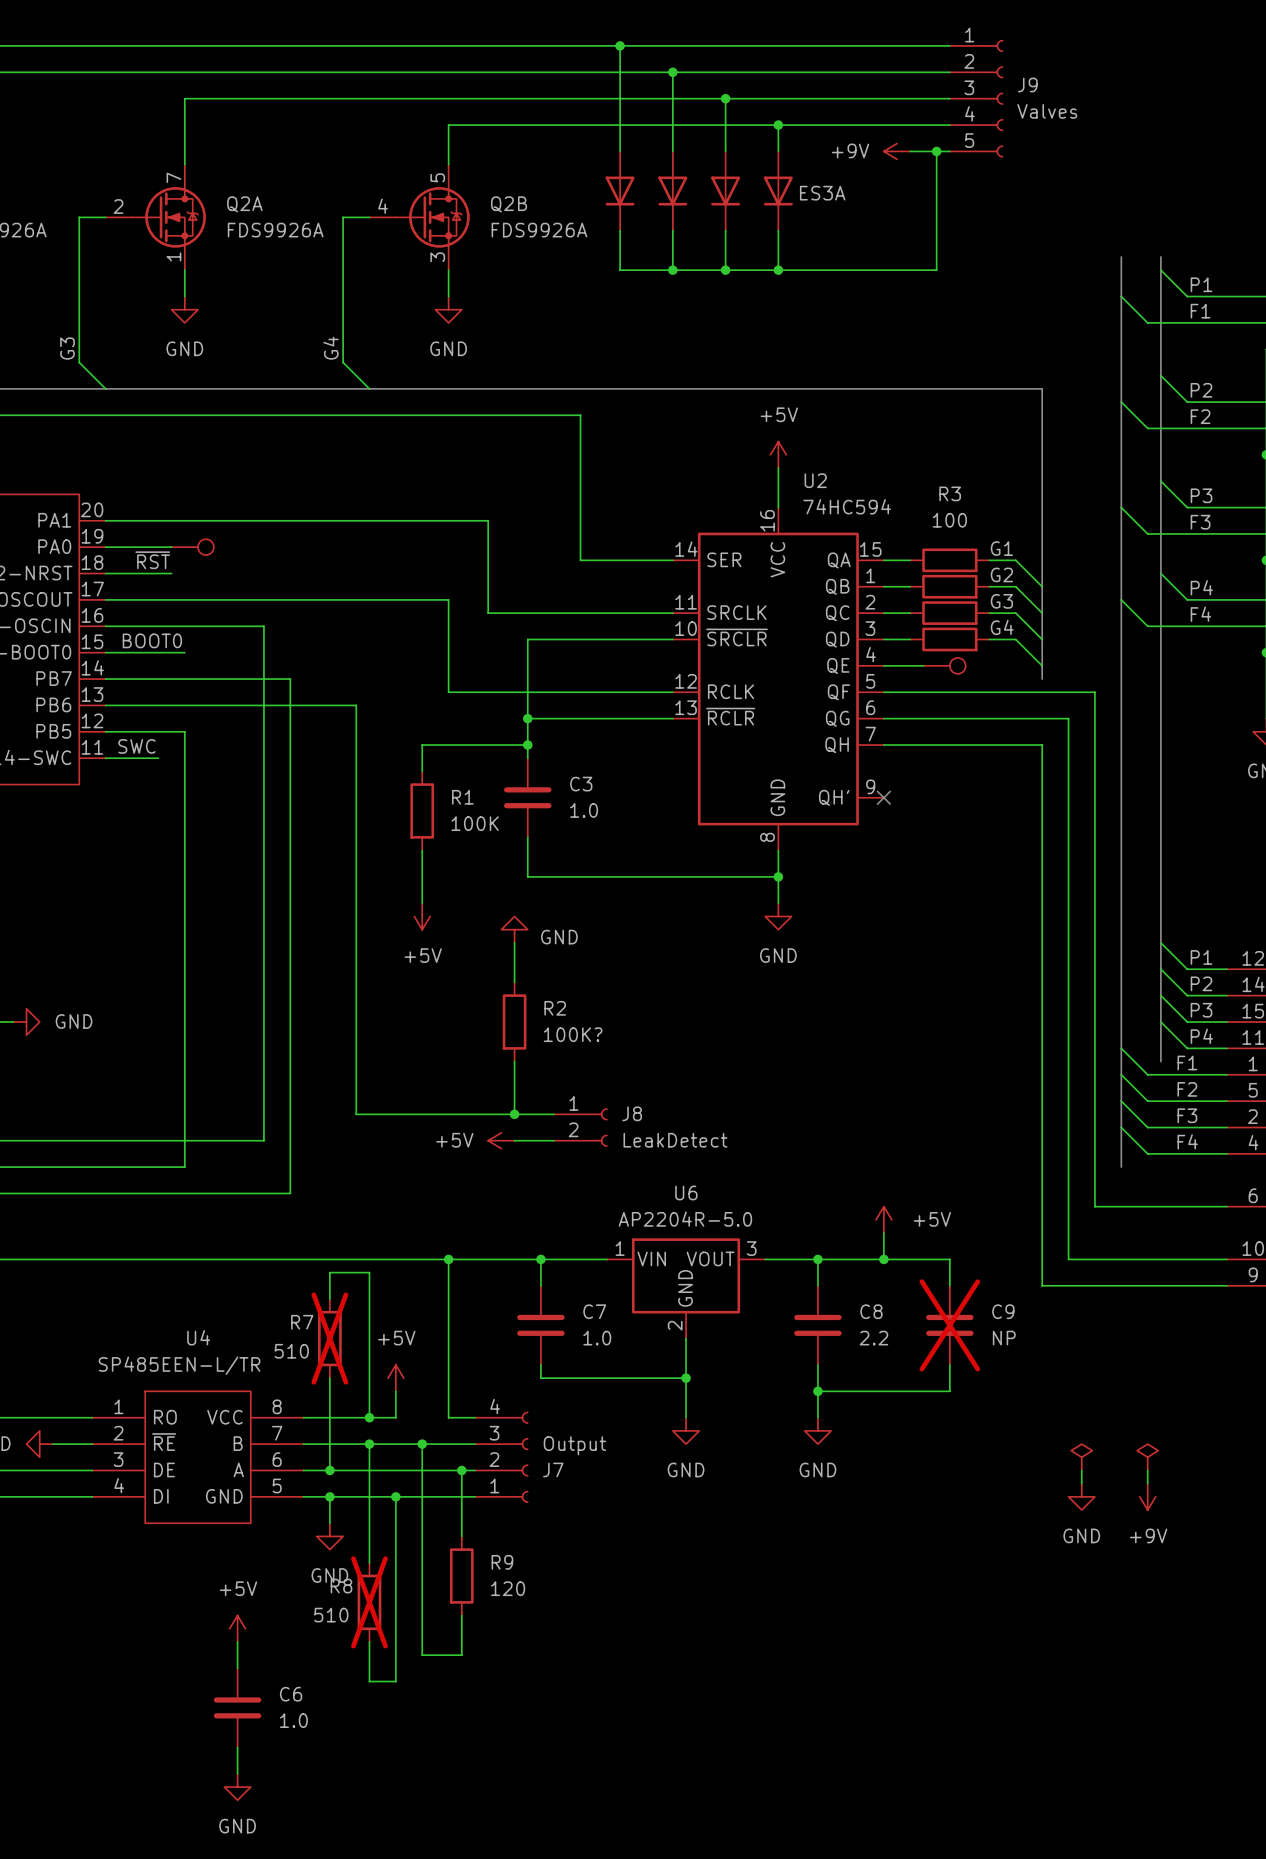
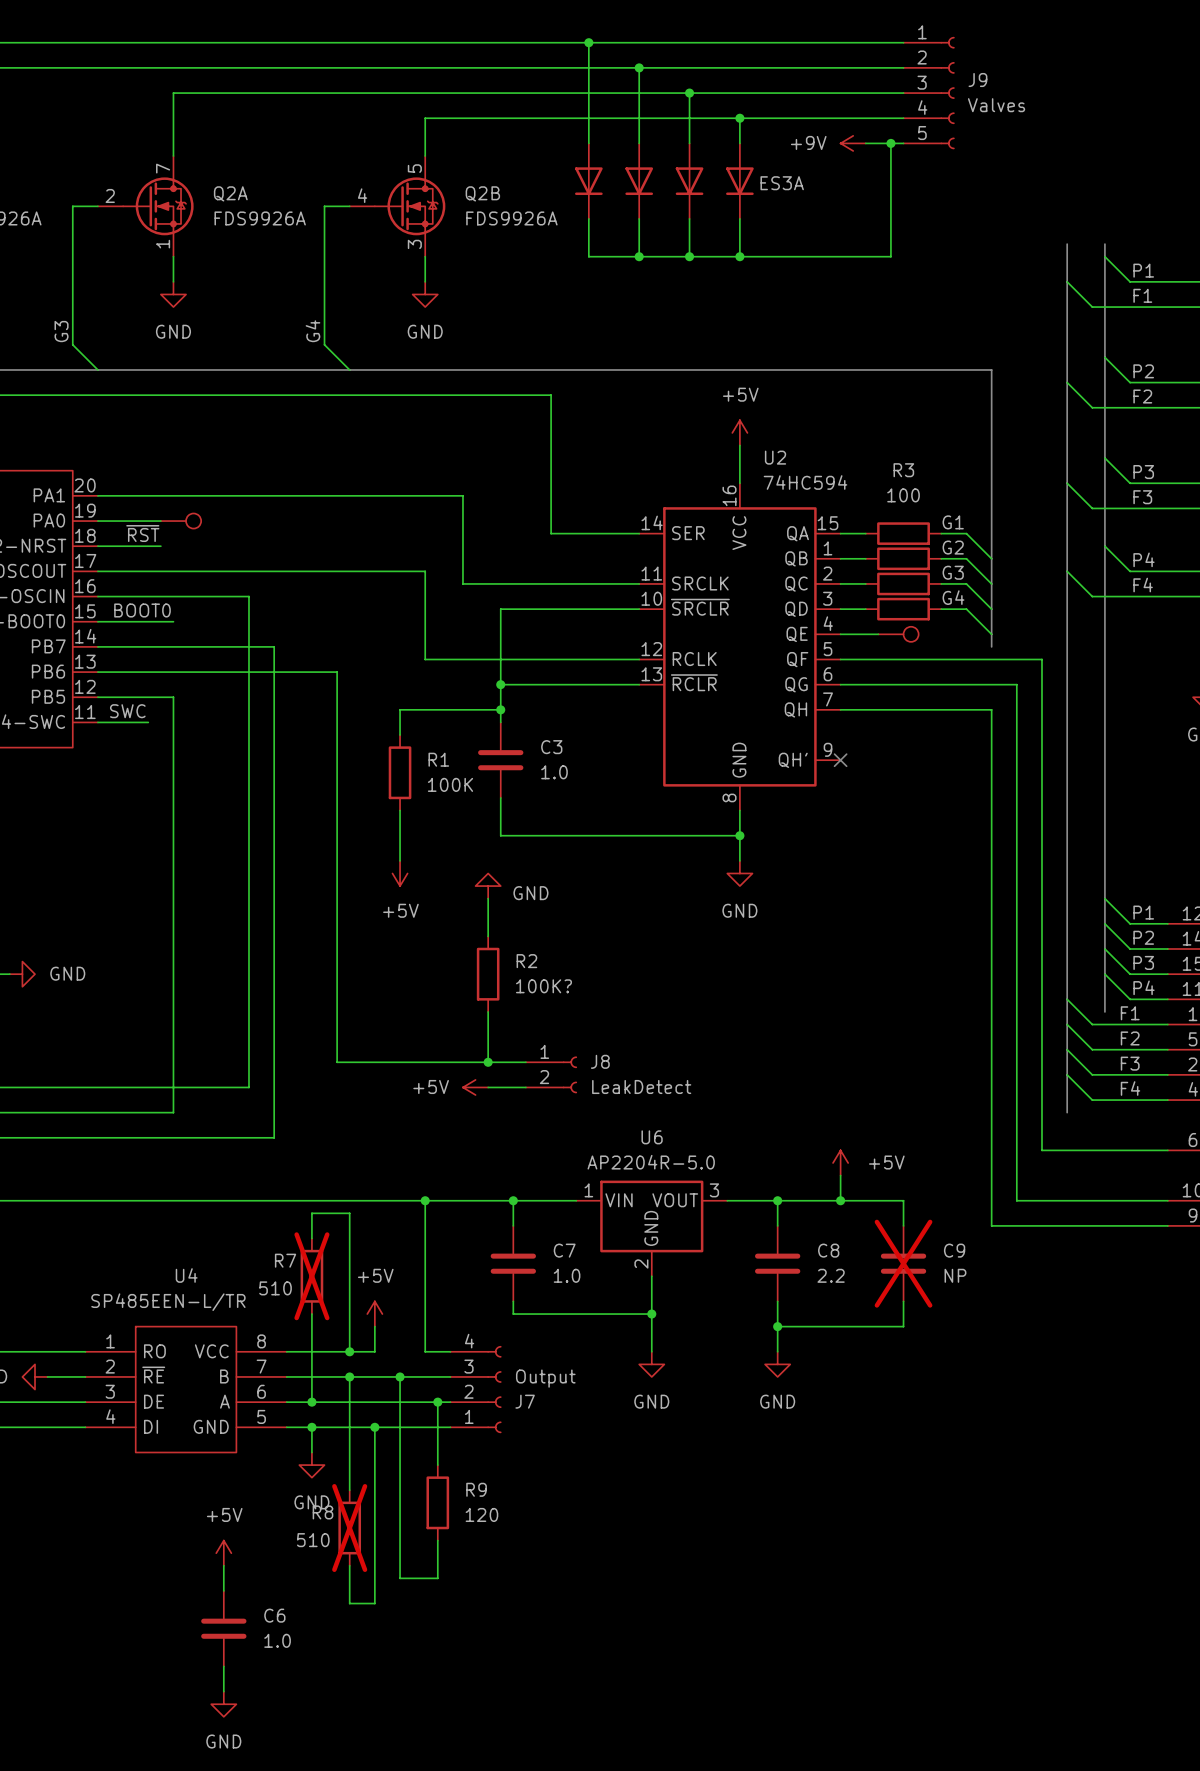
power symbol: (1081, 1457) -> none
power symbol: (1147, 1457) -> none
wire: (1081, 1470) (1081, 1483) -> none
wire: (1147, 1470) (1147, 1483) -> none
power symbol: GND (1081, 1496) -> none
power symbol: +9V (1147, 1496) -> none

